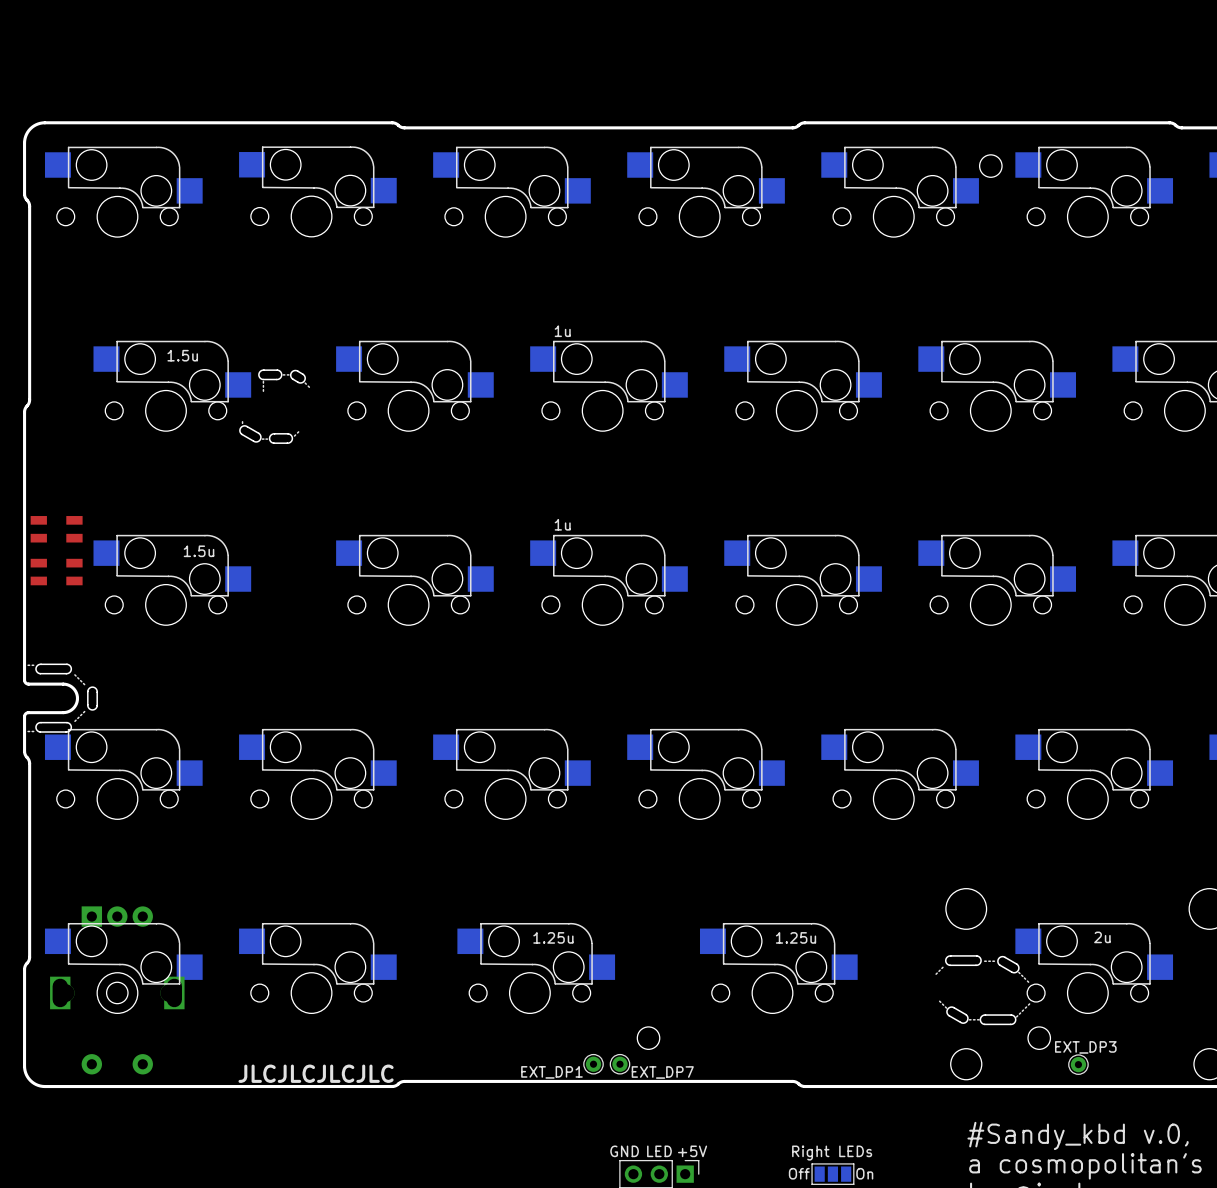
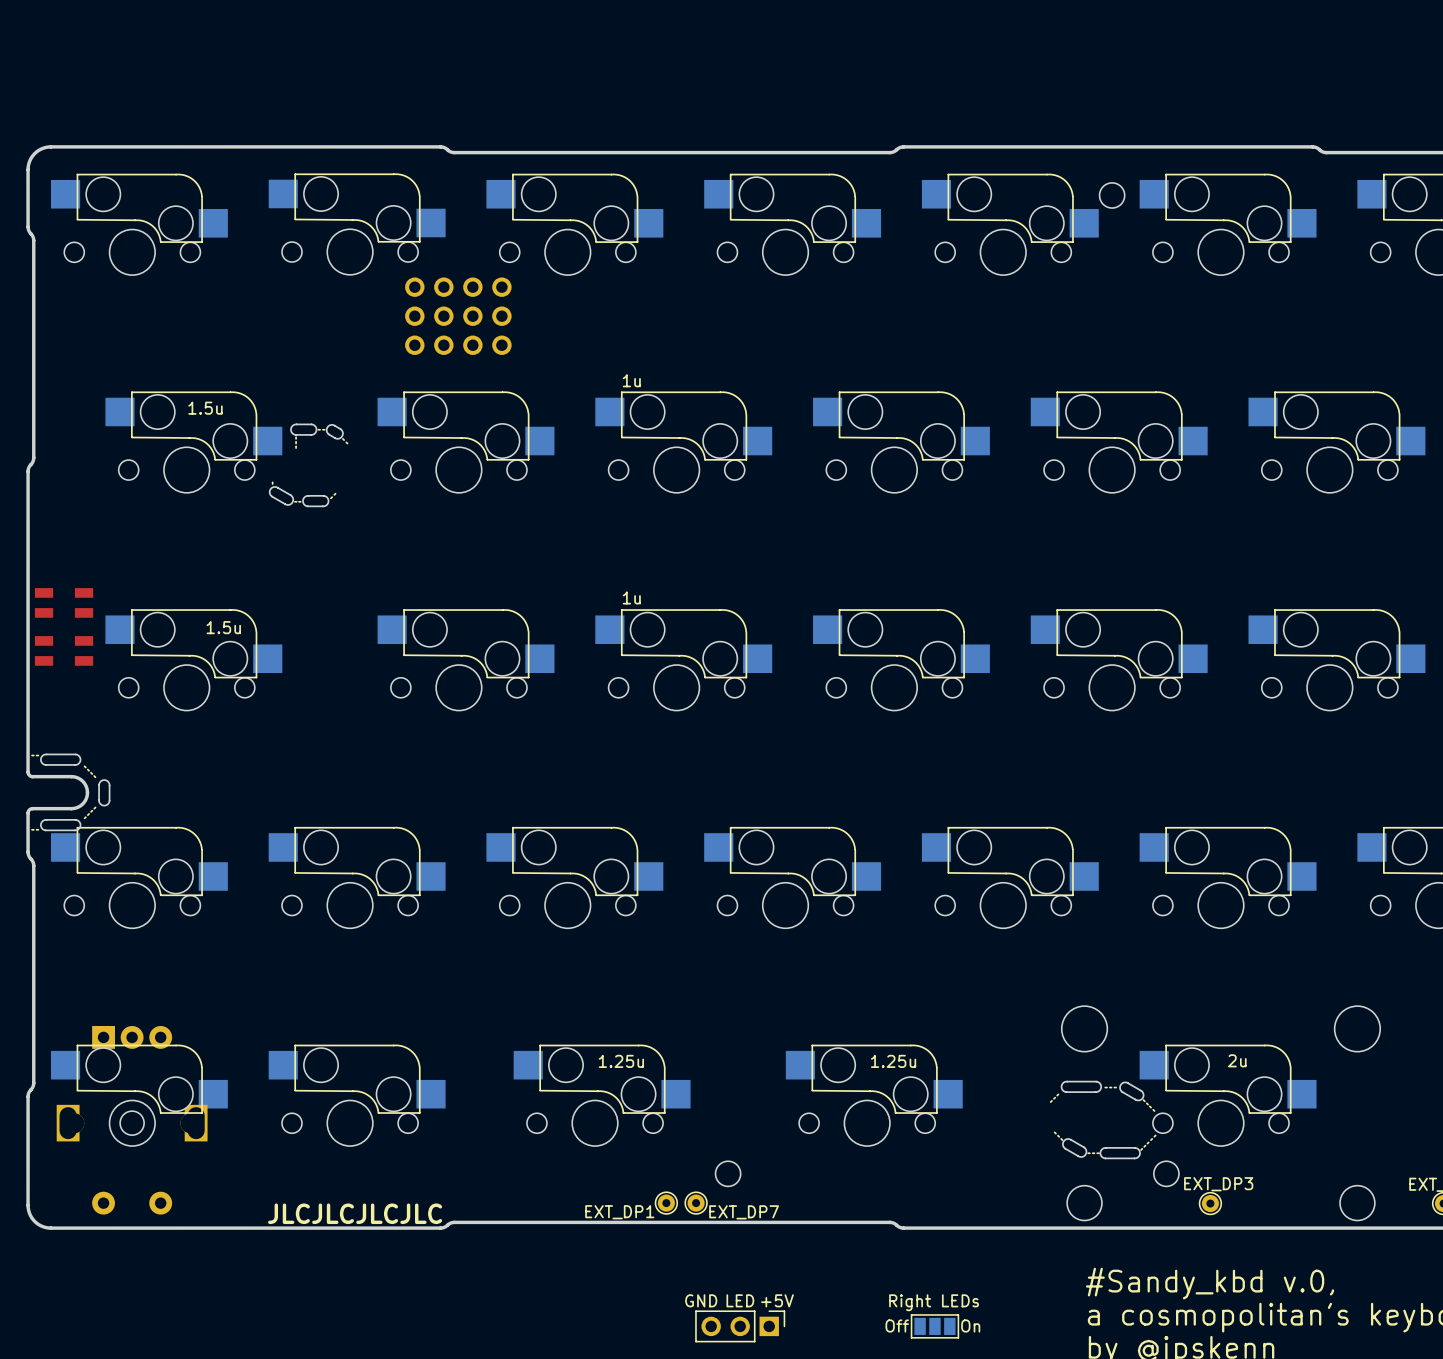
part: none -> (458, 316)

